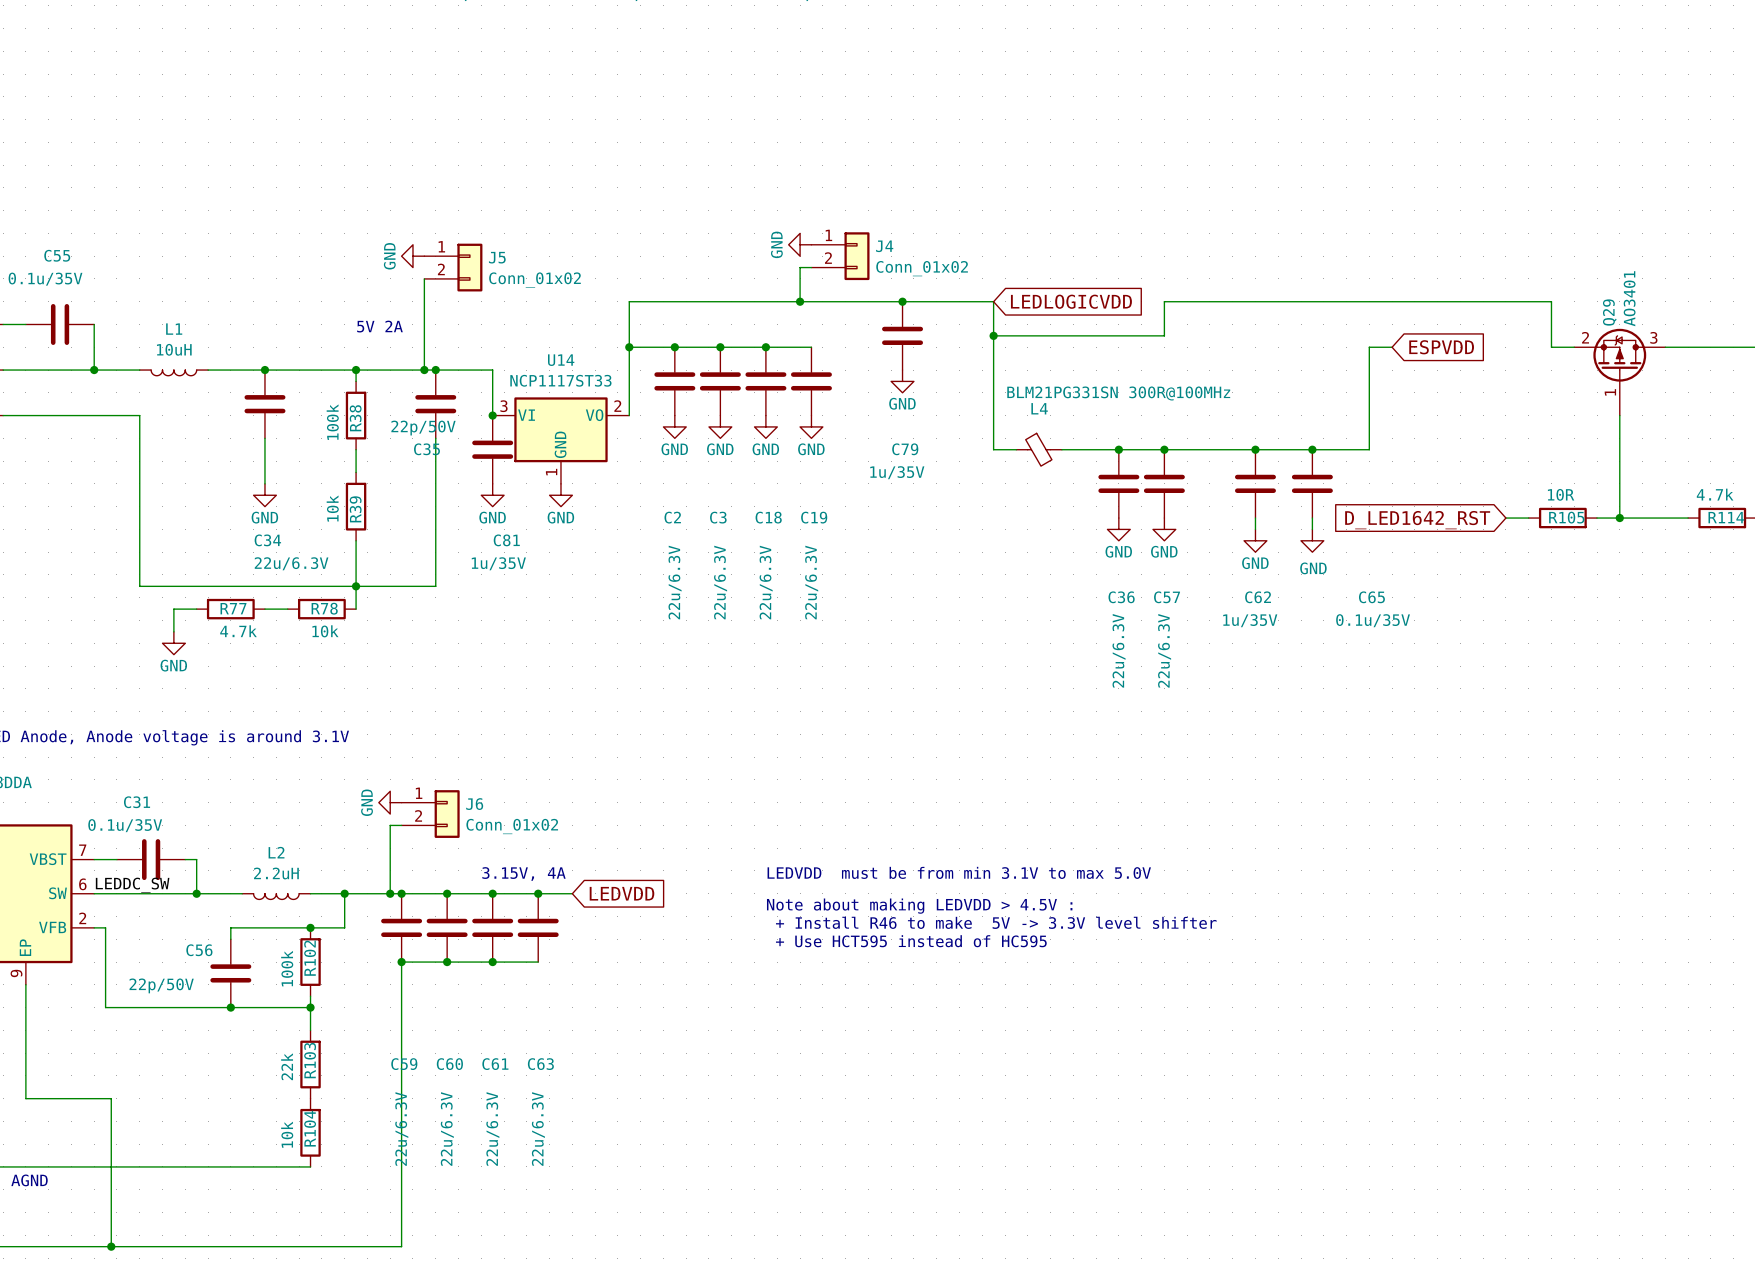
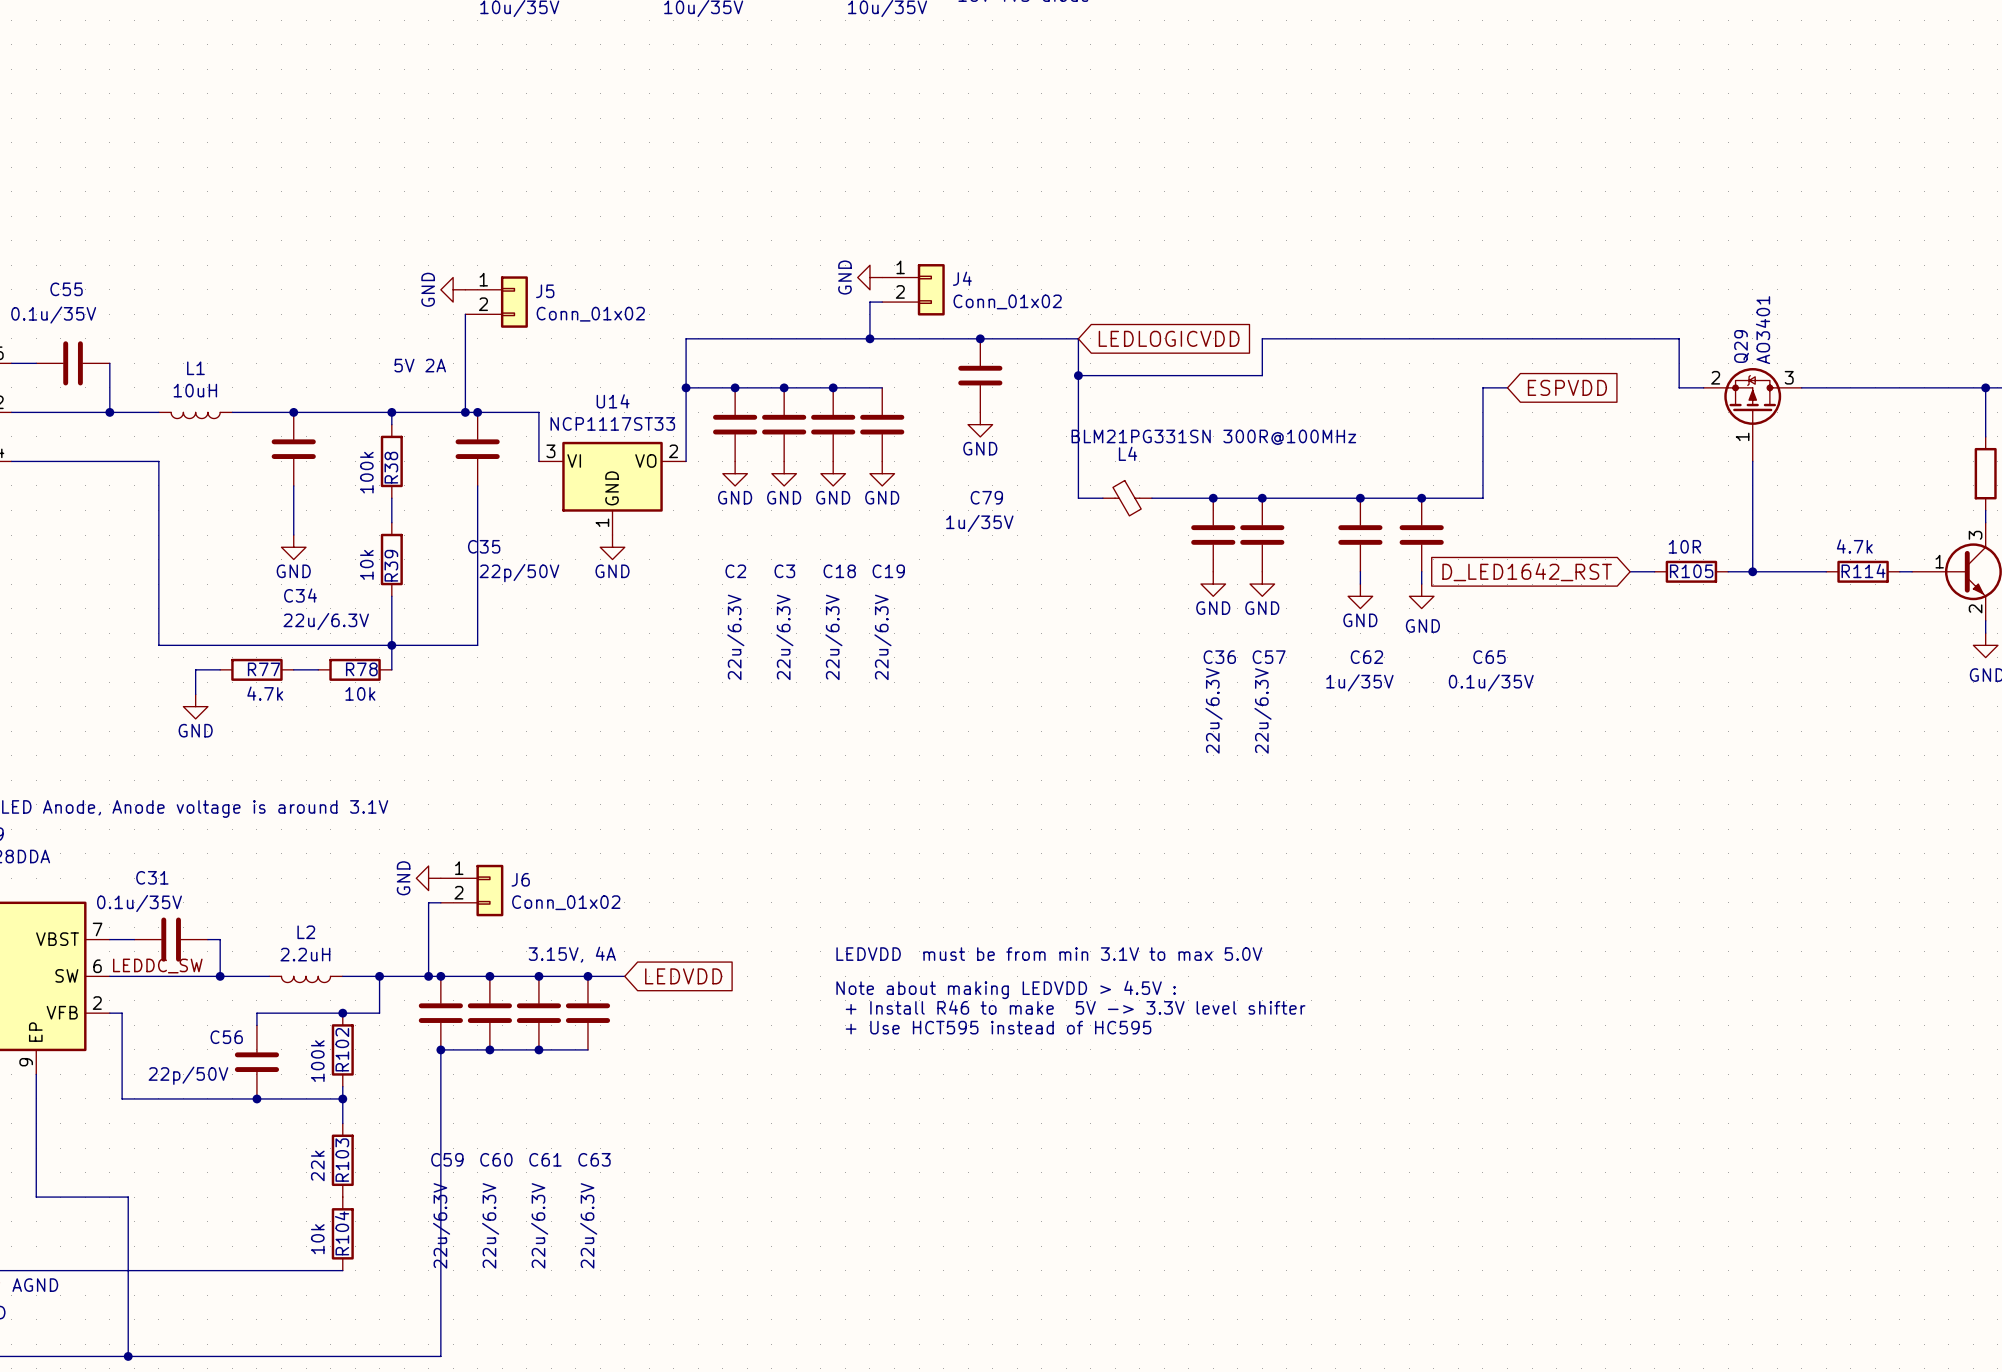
junction: (492, 415) -> none
C35 value position: 22p/50V (423, 428) -> 22p/50V (519, 573)
C35 name position: C35 (426, 449) -> C35 (484, 546)
C81: 1u/35V (492, 449) -> none
power symbol: GND (492, 495) -> none

